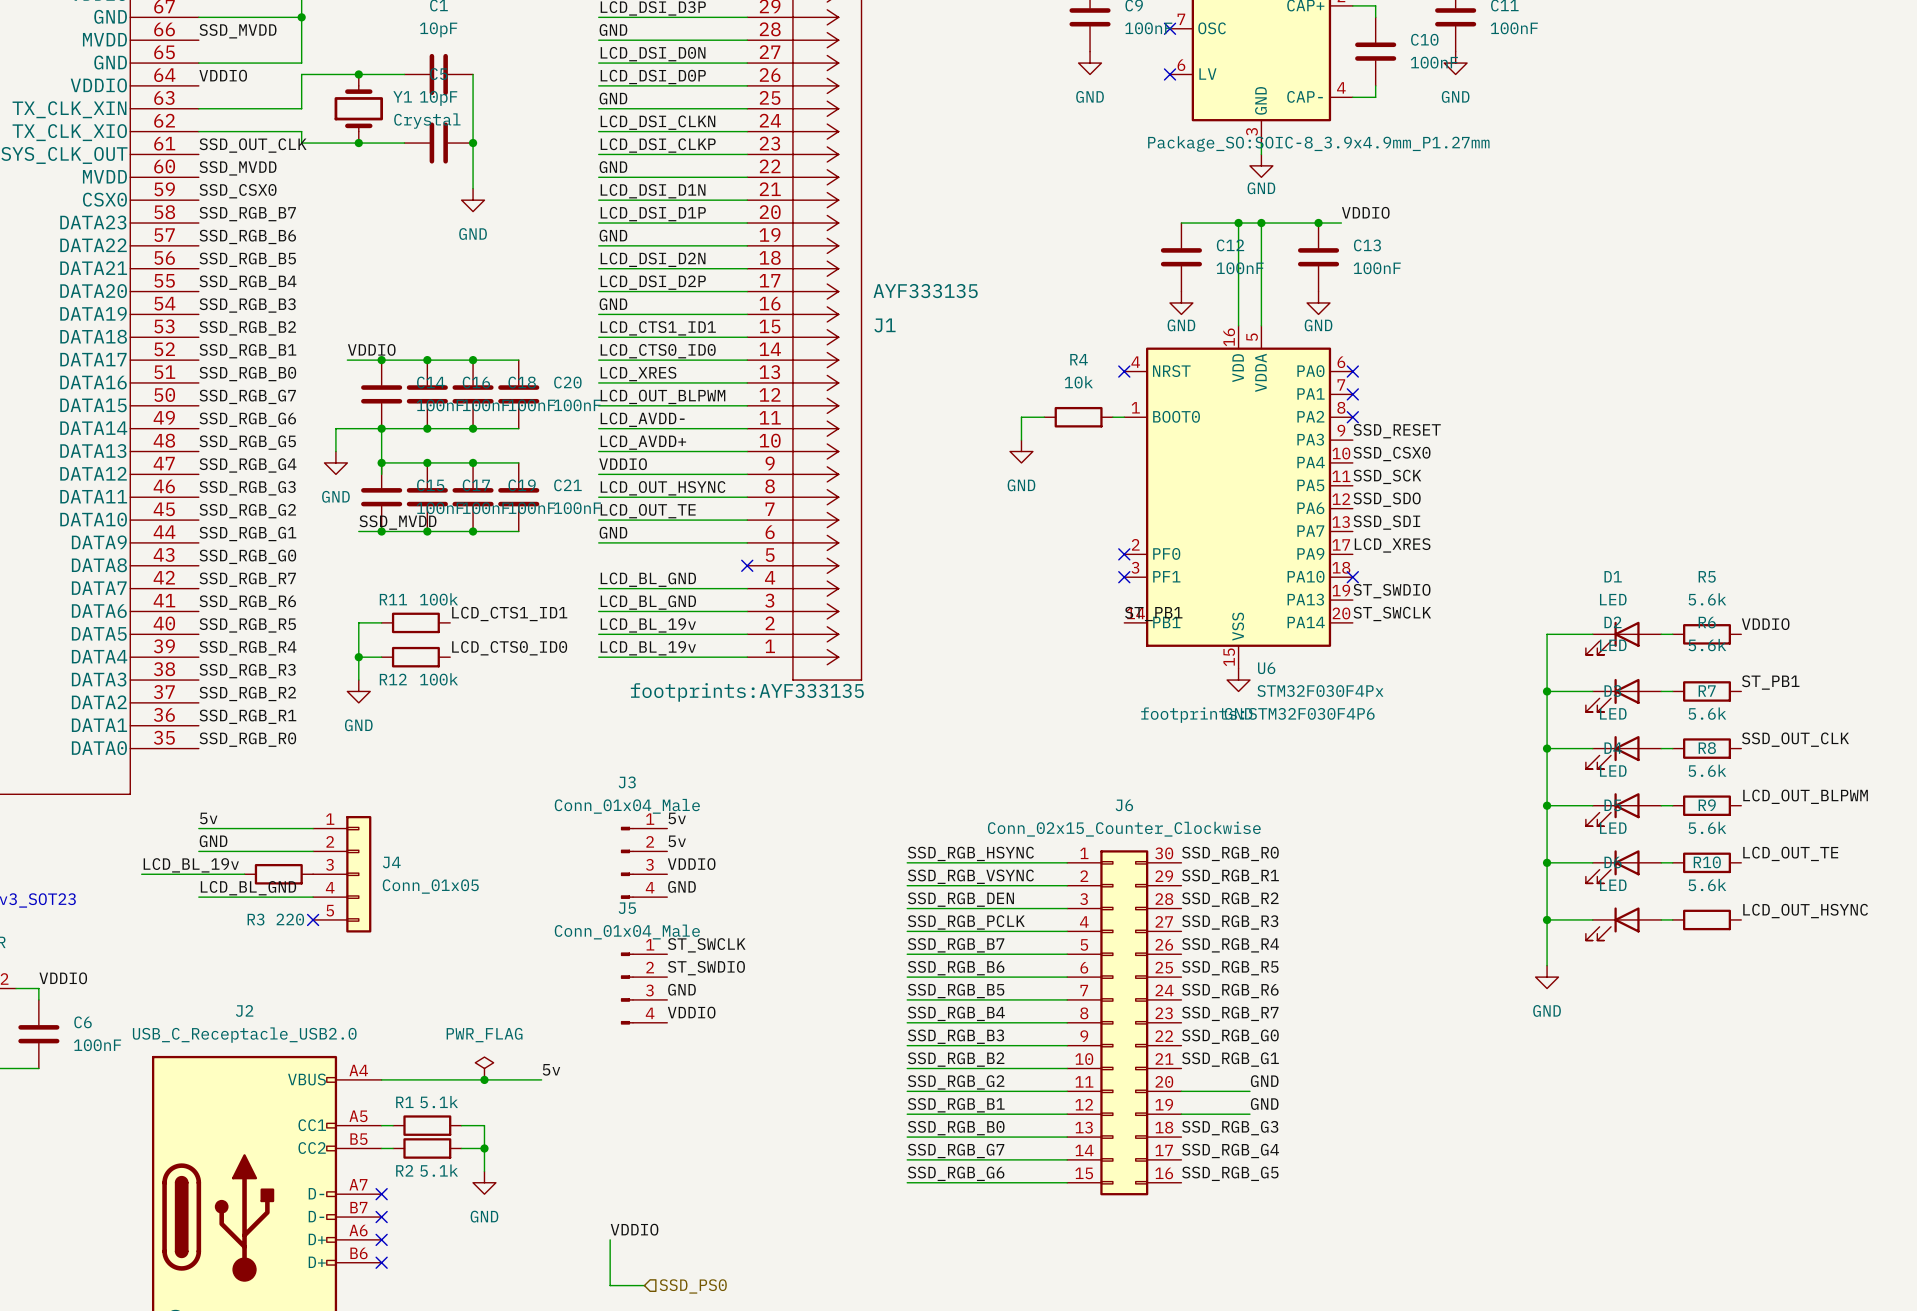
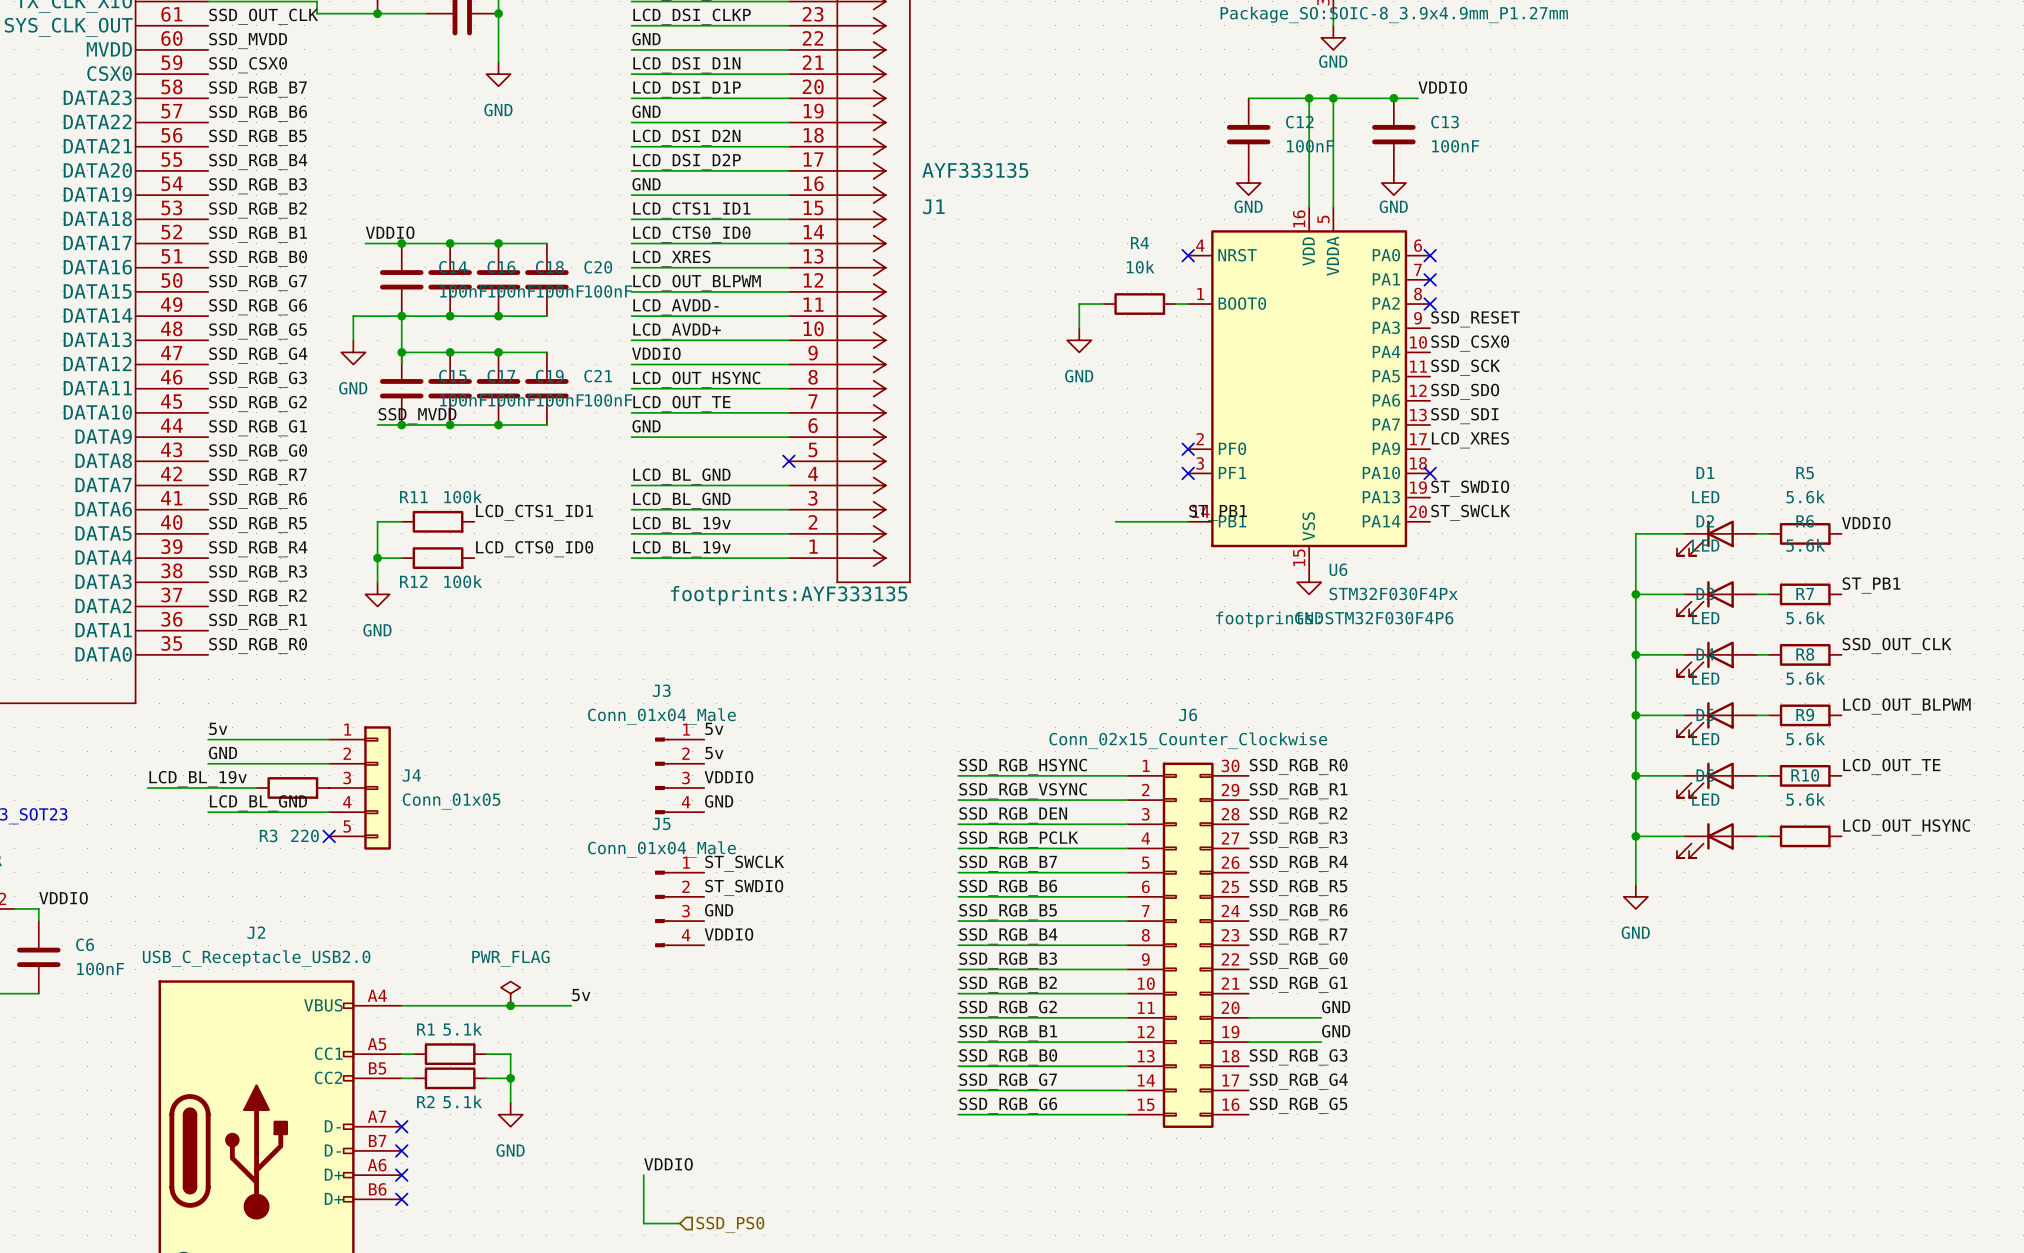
wire: none -> (1115, 521) (1188, 521)

